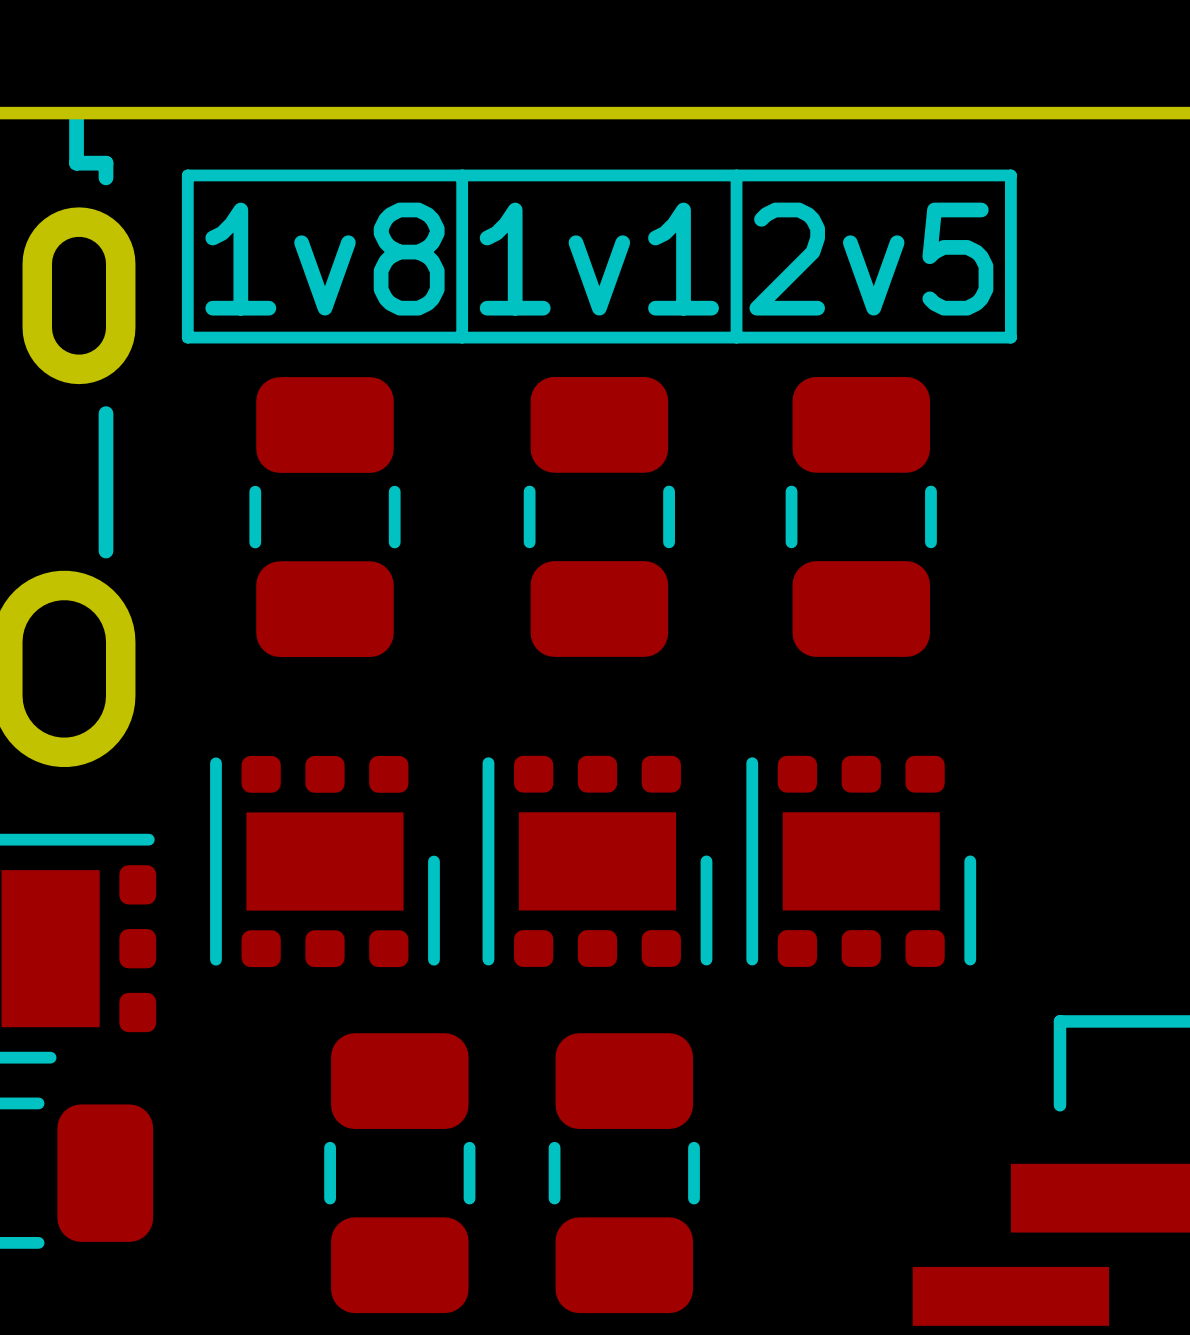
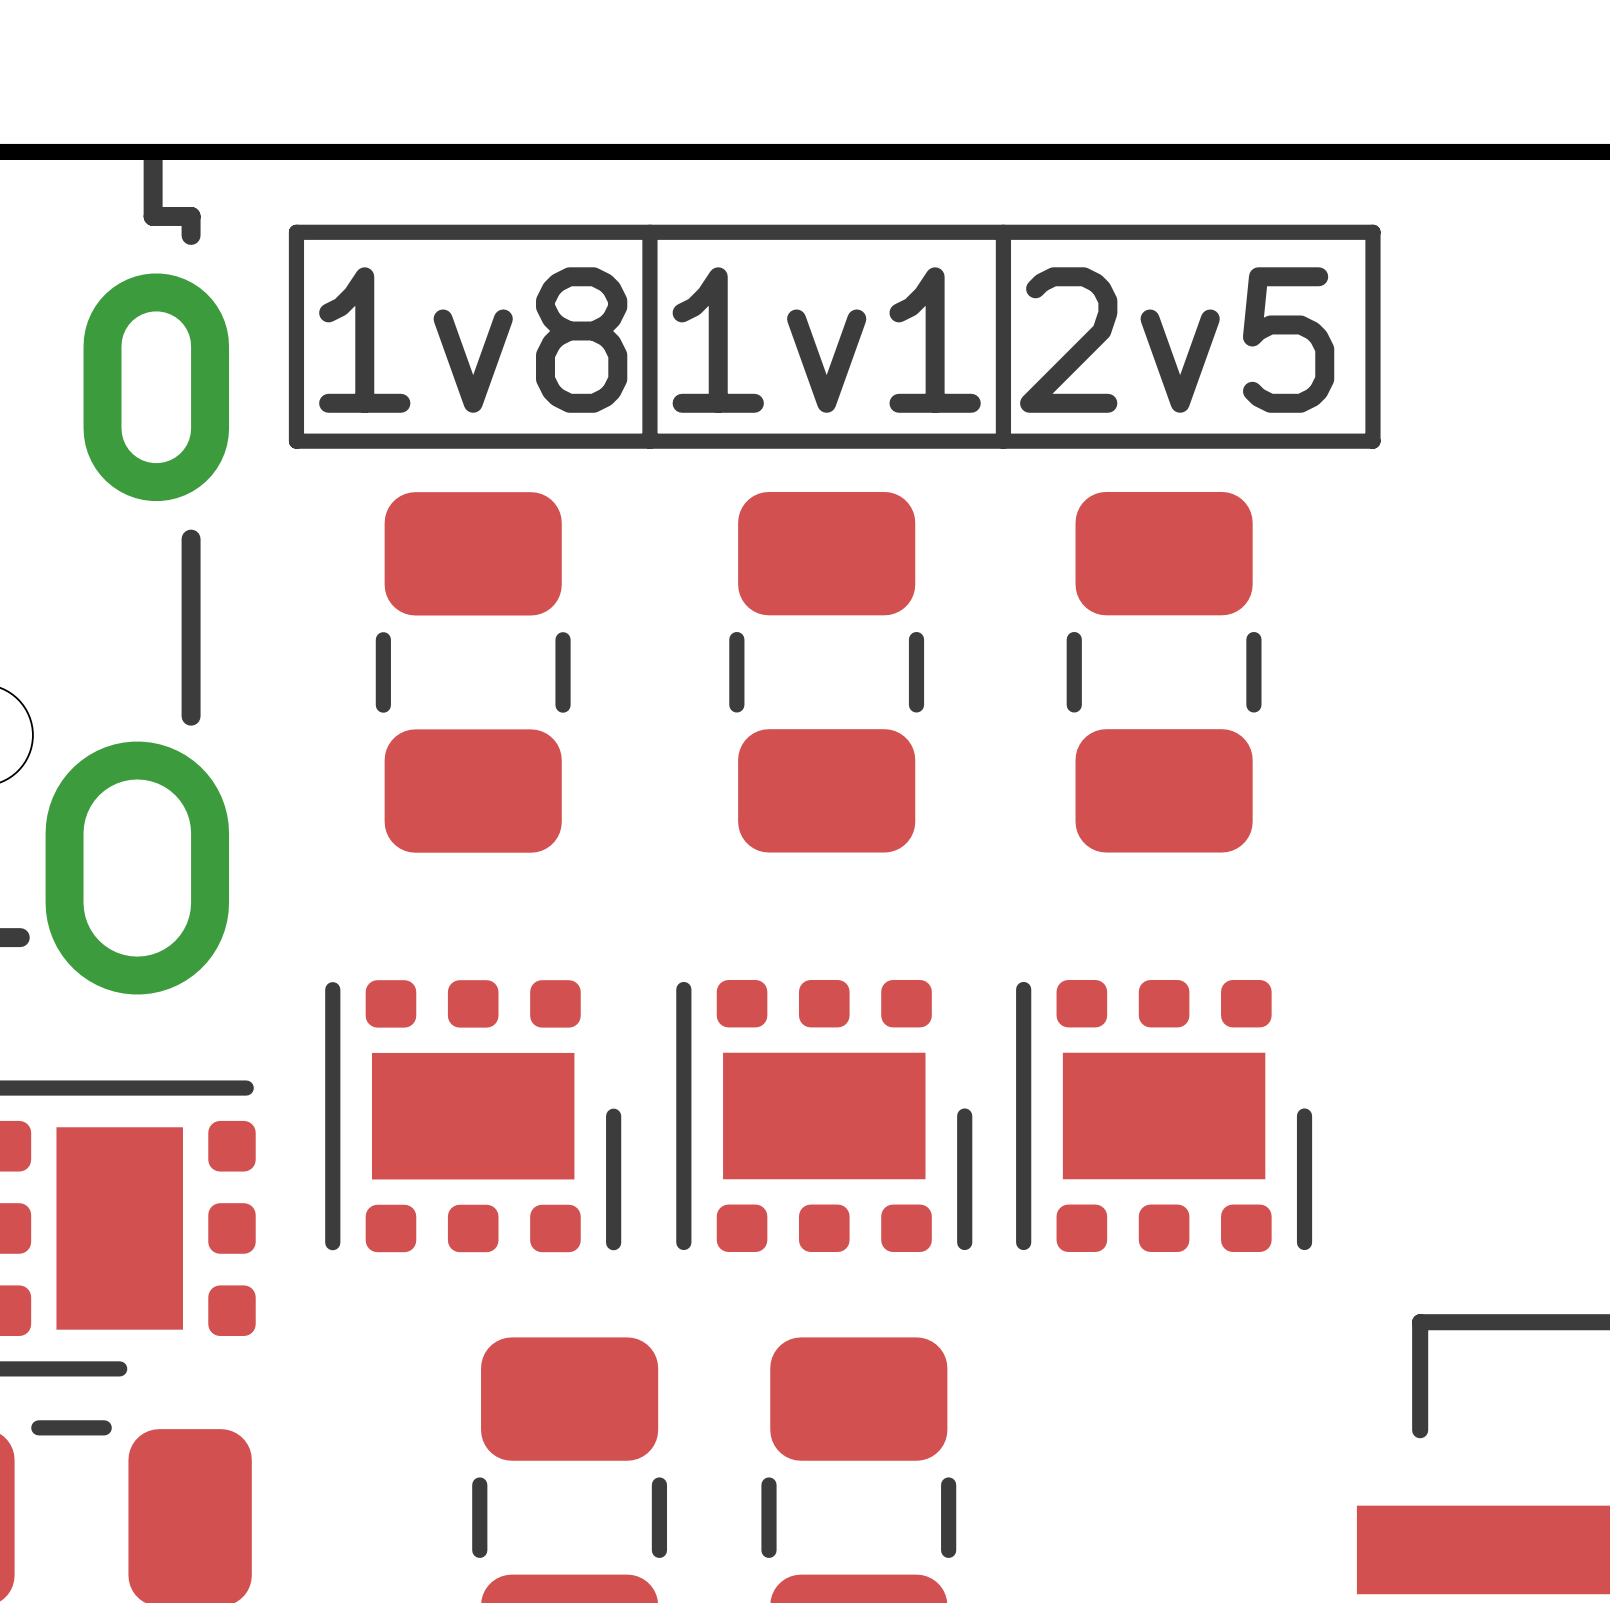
line: (1010, 175) (1010, 337) -> (1356, 232) (1372, 232) (1372, 441) (1356, 441)

